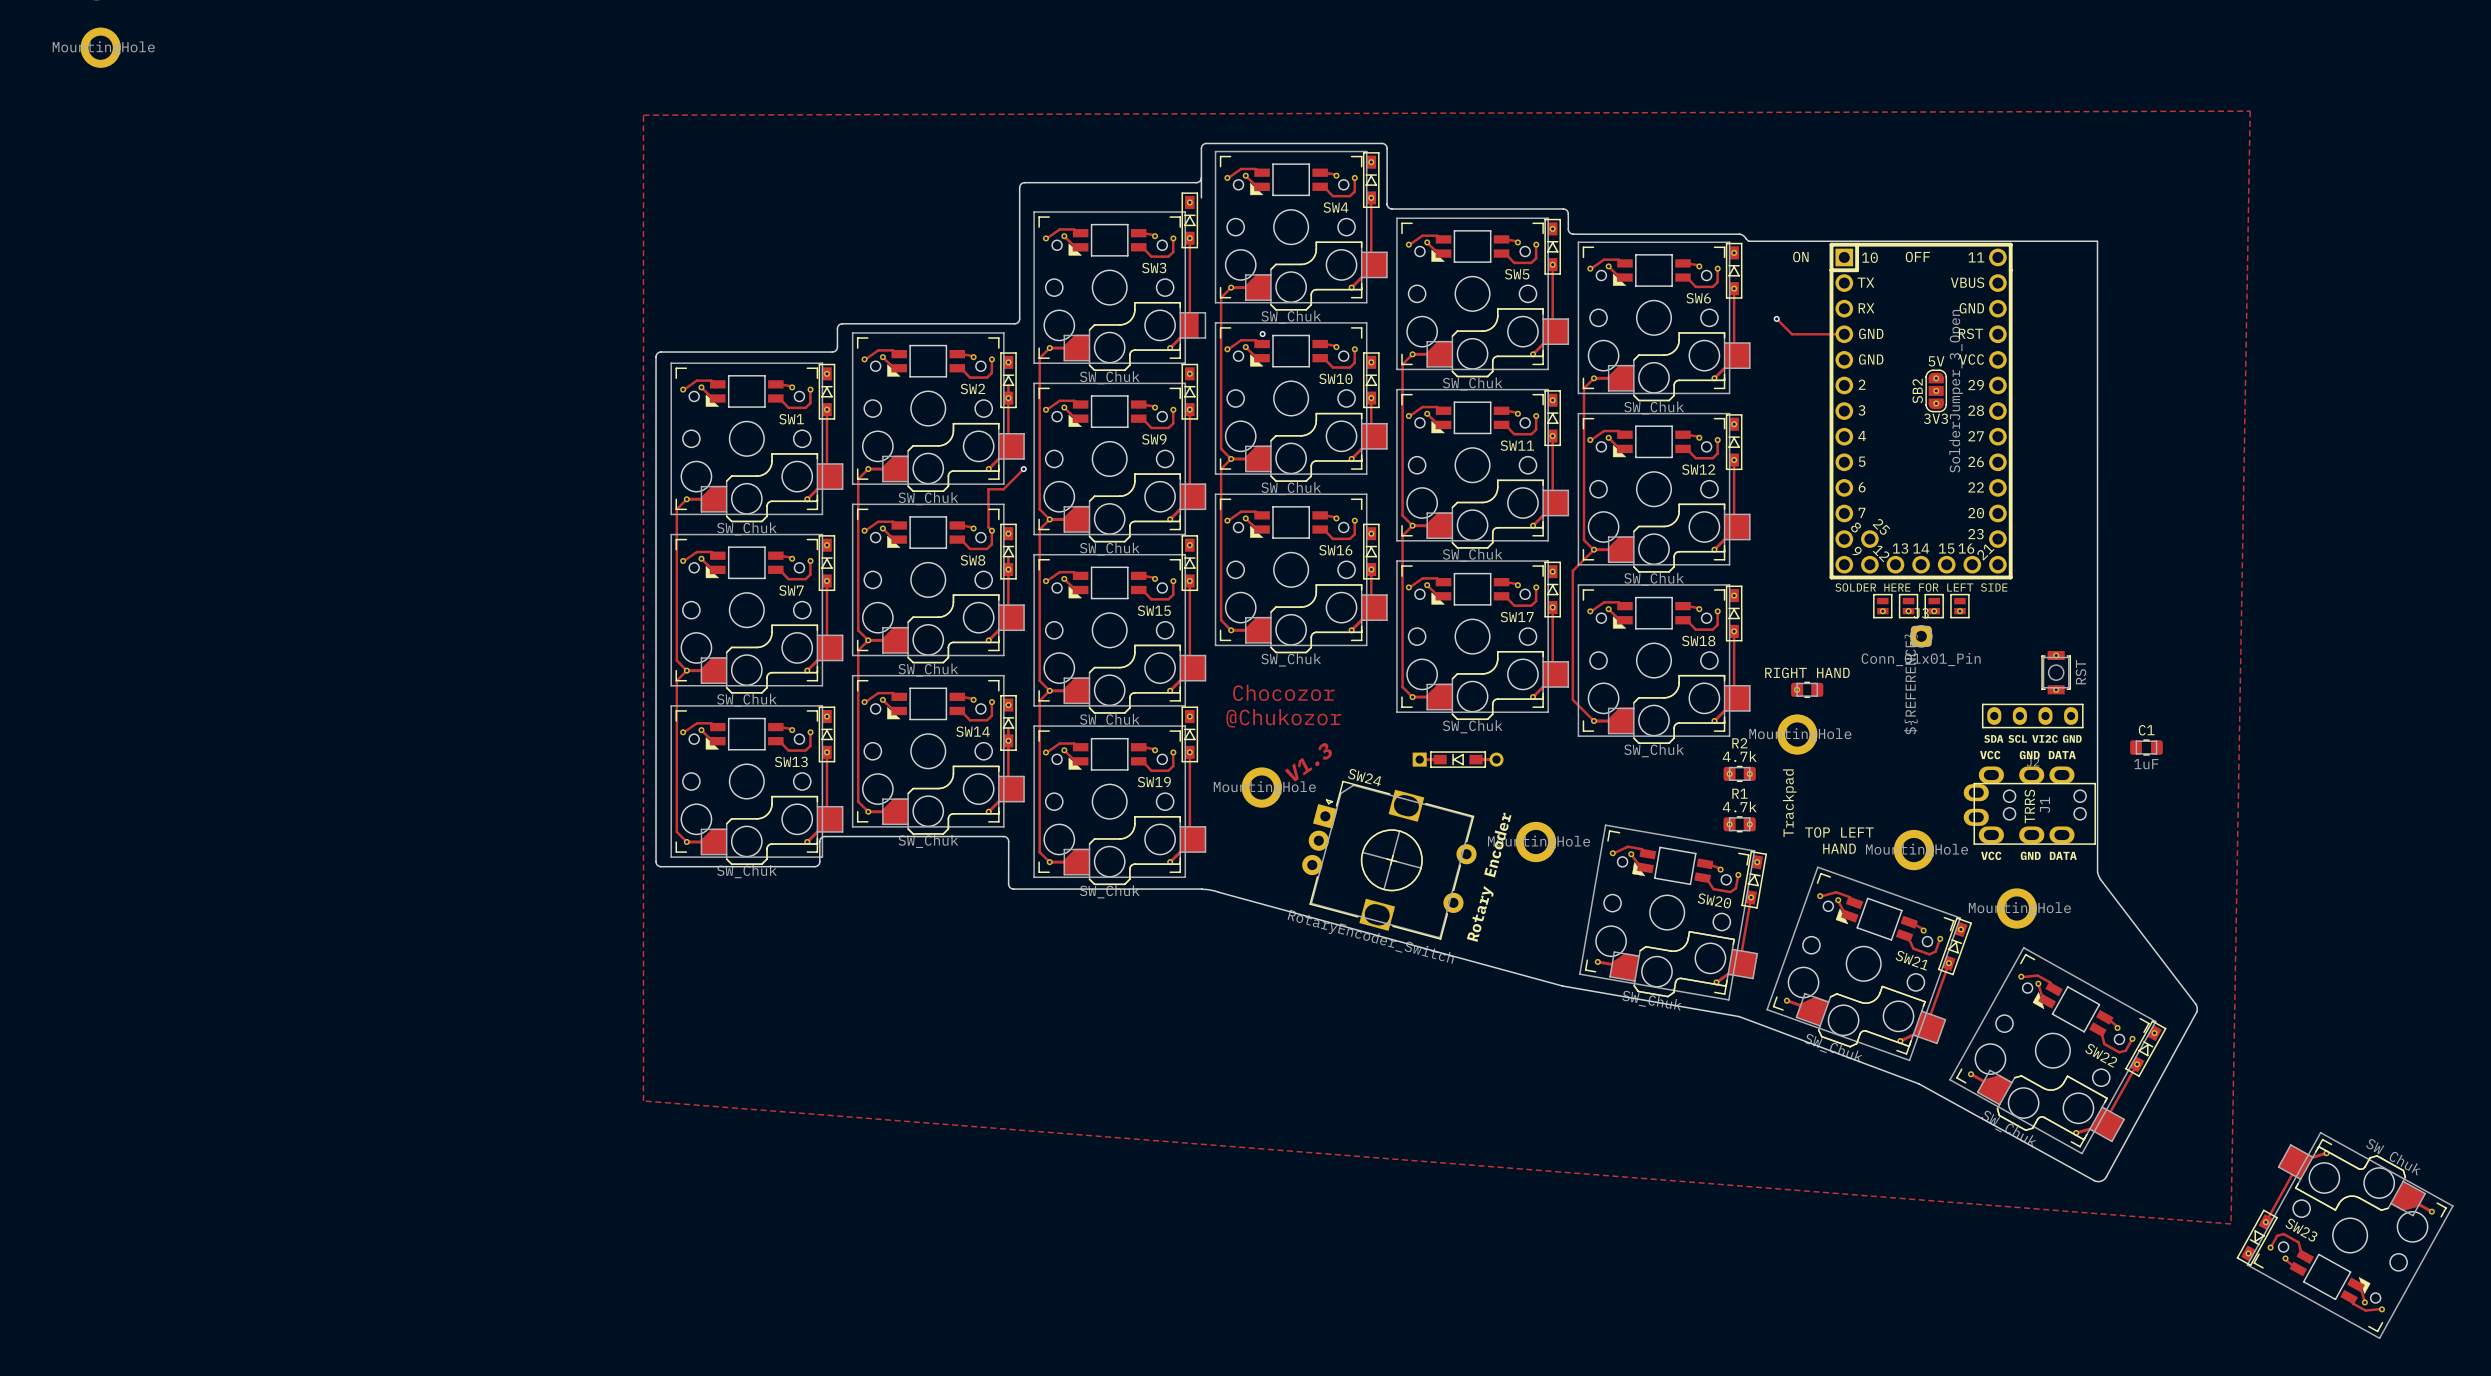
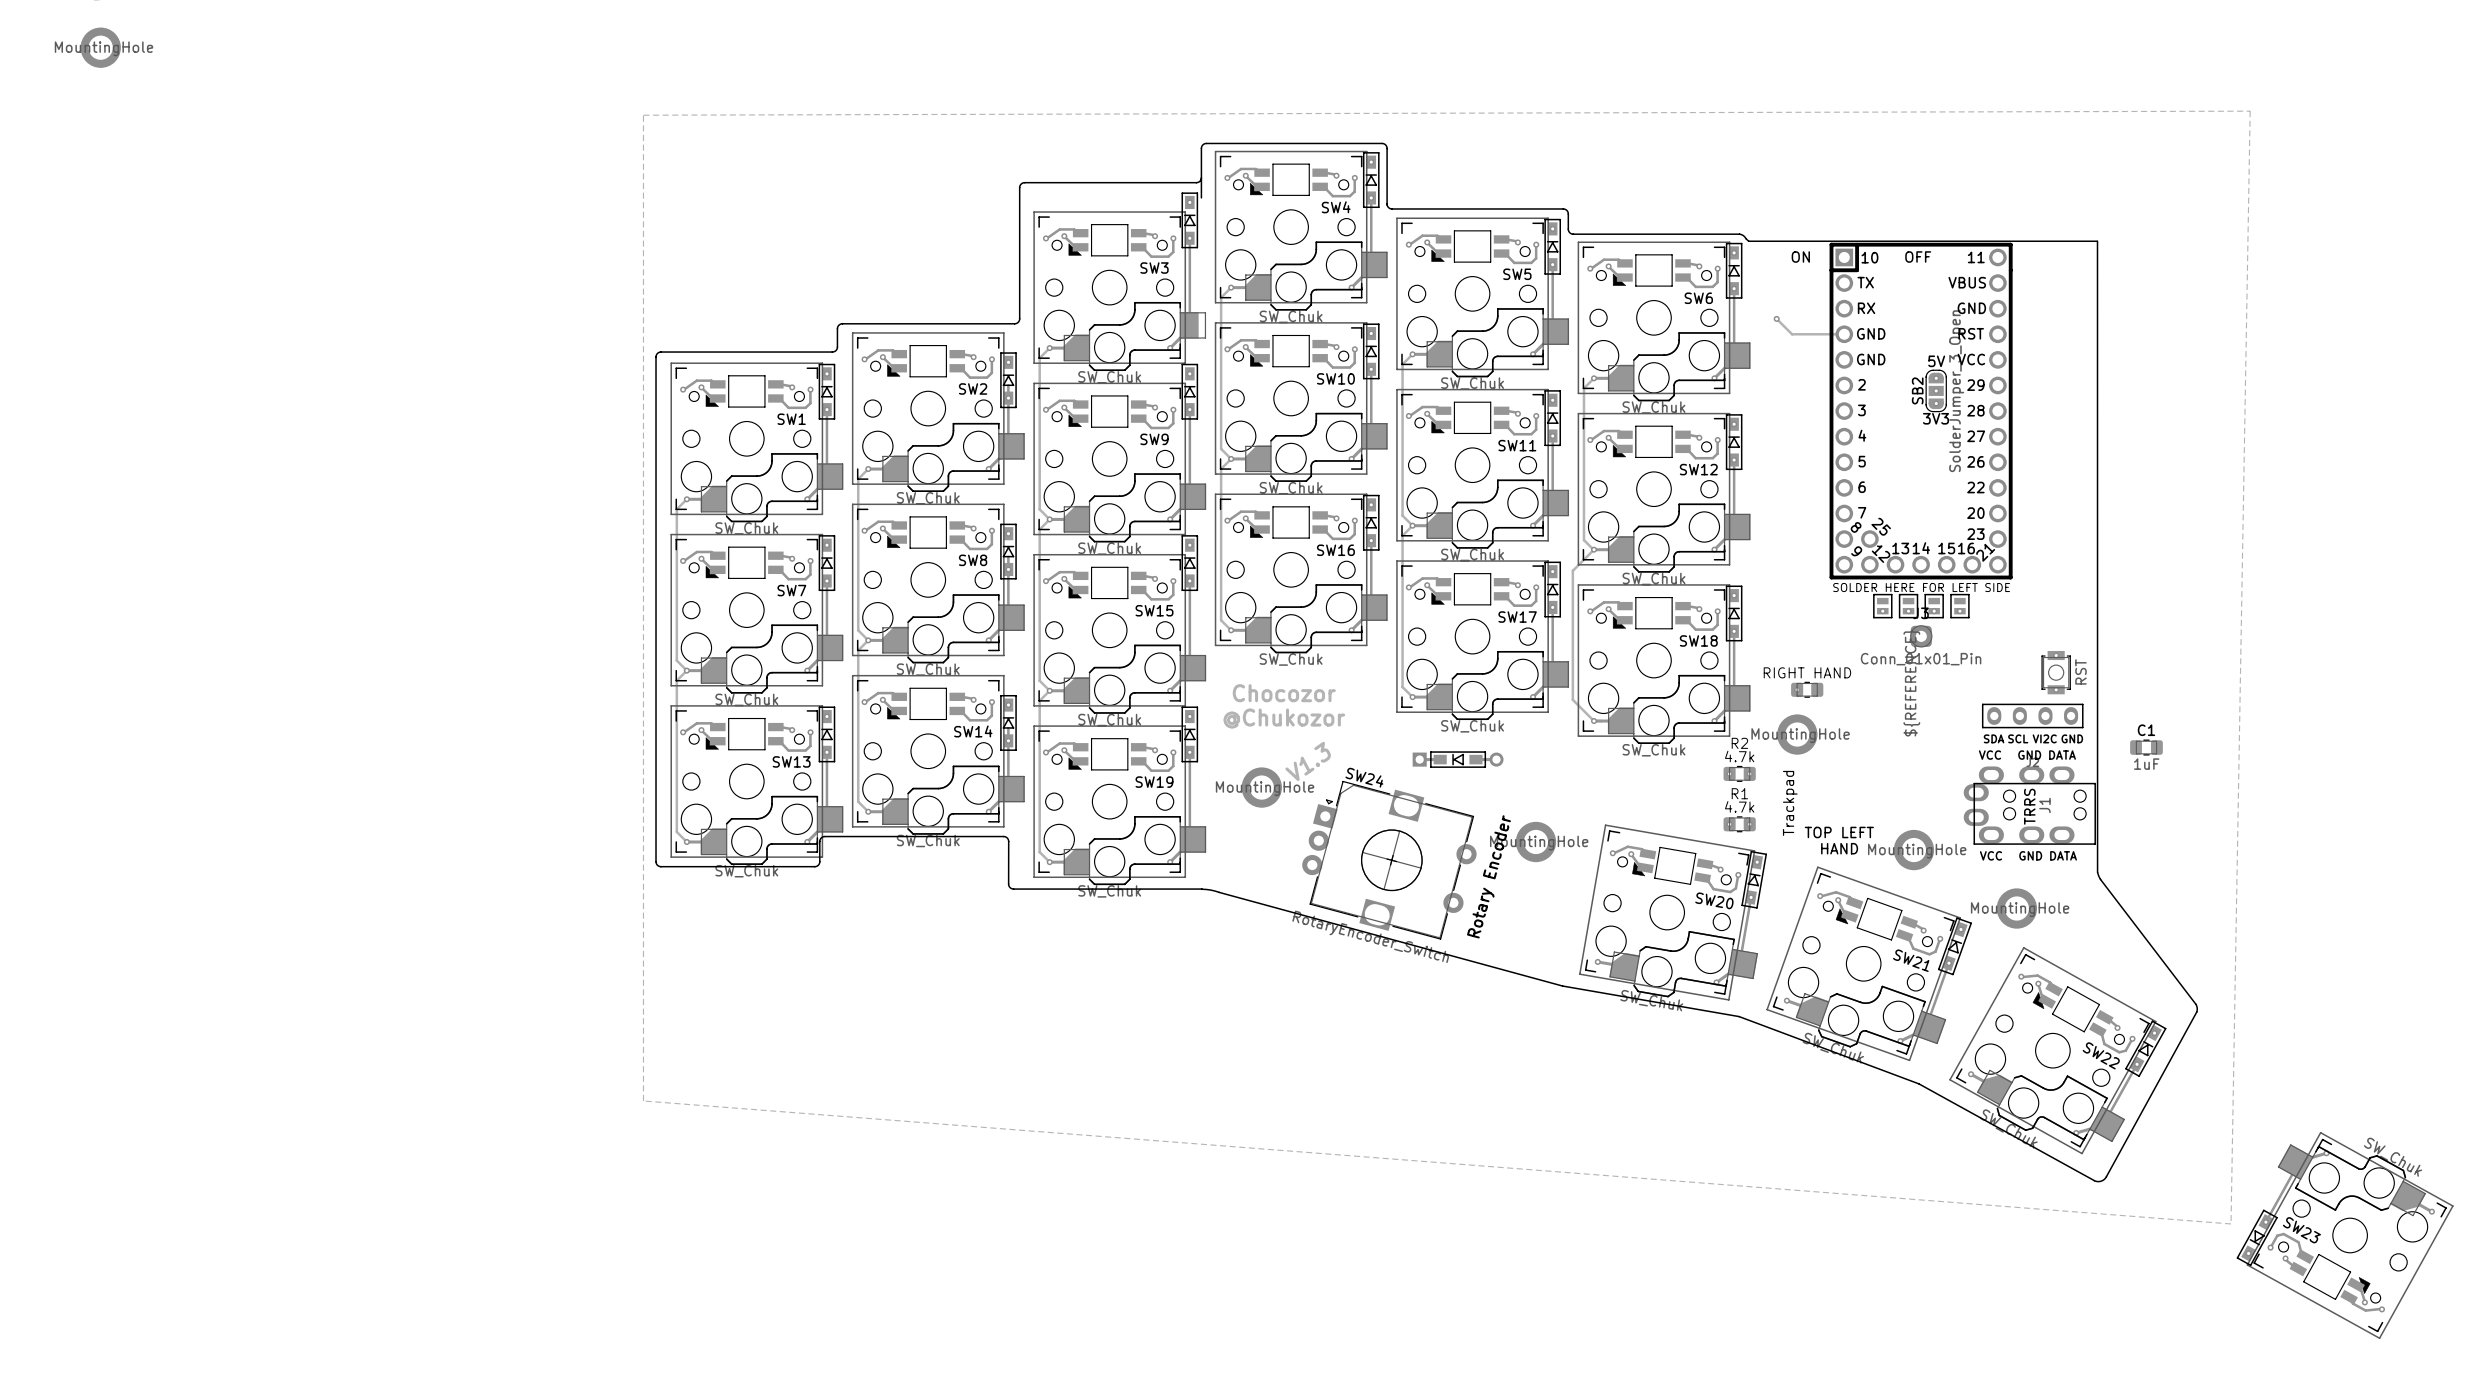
SW10 footprint: [1214, 322, 1388, 482] -> [1214, 322, 1388, 482]
via: (1262, 334) -> none
track: (1023, 469) (1003, 489) (988, 489) (988, 527) (991, 530) -> none
via: (1023, 469) -> none
SW16 footprint: [1214, 493, 1388, 654] -> [1214, 493, 1388, 654]

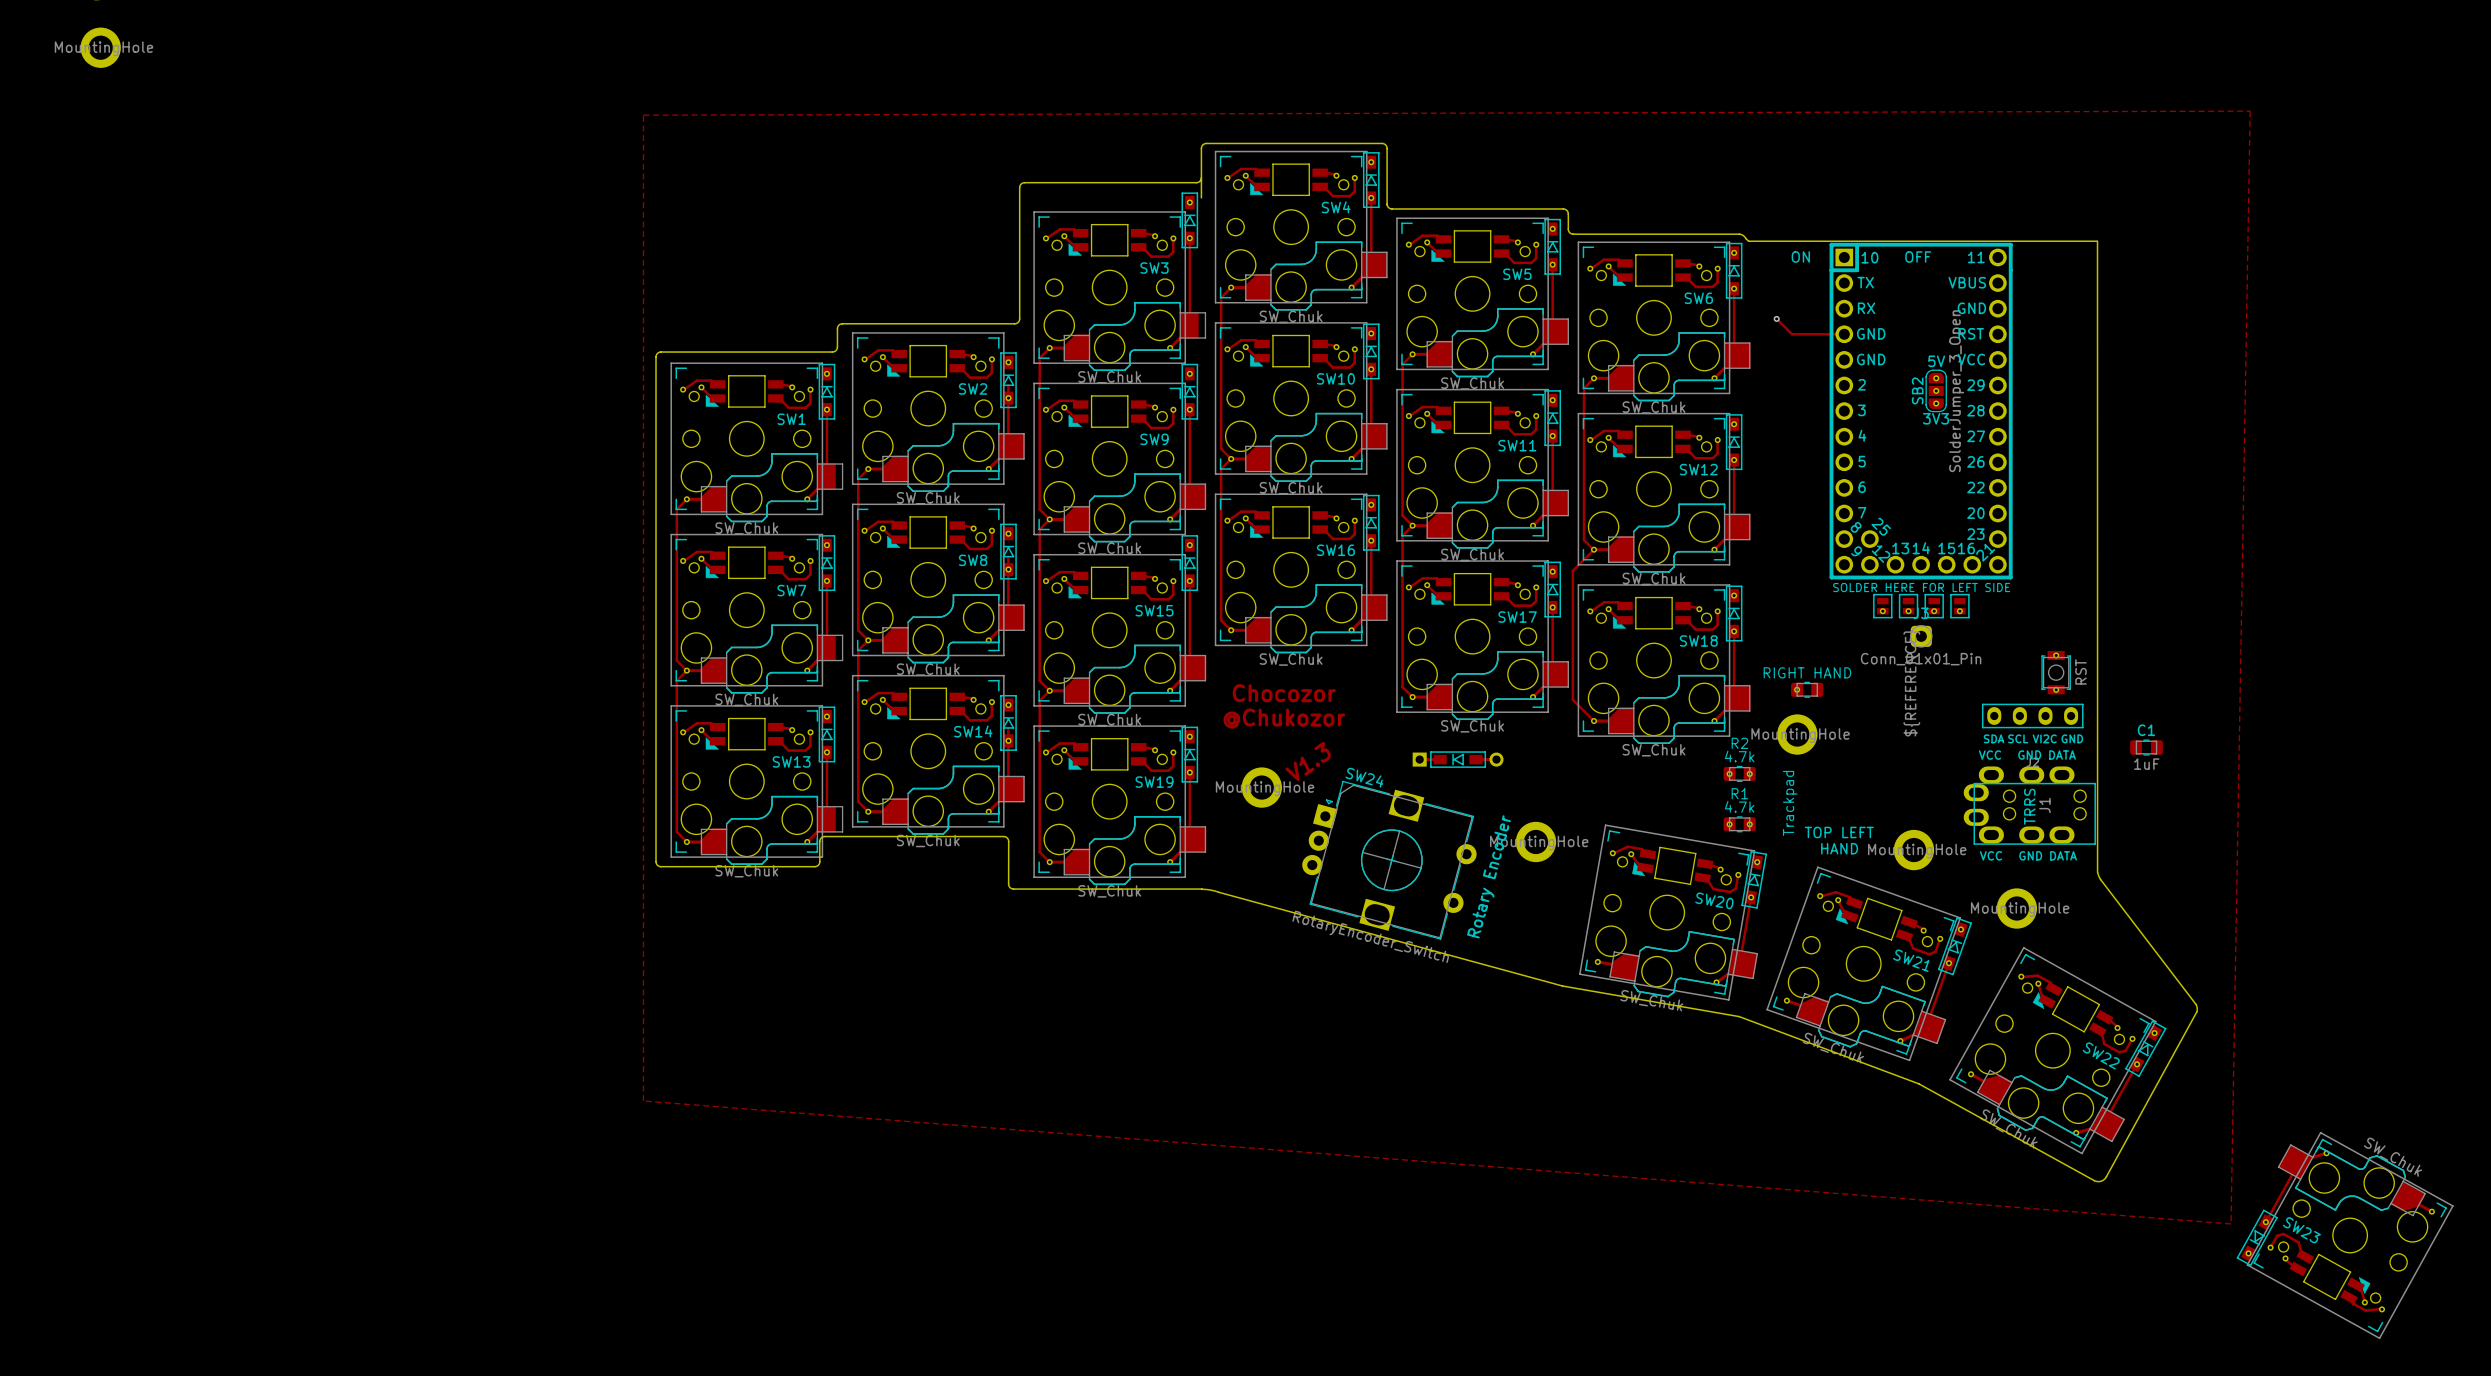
SW1 footprint: [670, 362, 844, 523] -> [670, 362, 844, 523]
SW7 footprint: [670, 533, 844, 694] -> [670, 533, 844, 694]
SW13 footprint: [670, 705, 844, 865] -> [670, 705, 844, 865]
SW19 footprint: [1033, 706, 1207, 886] -> [1033, 725, 1207, 886]

